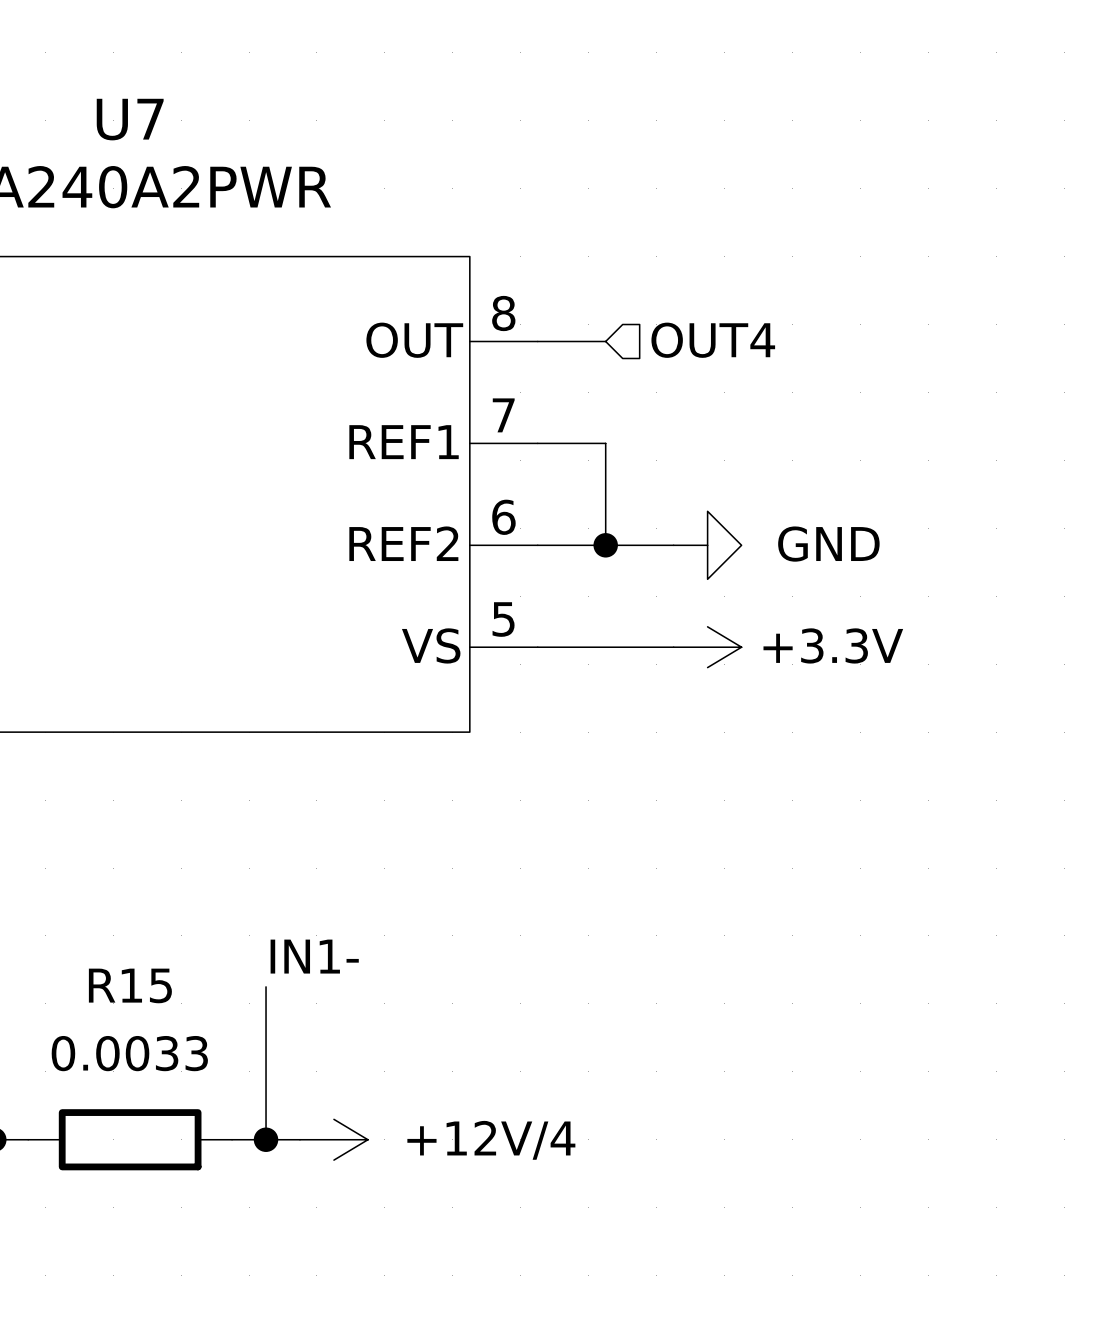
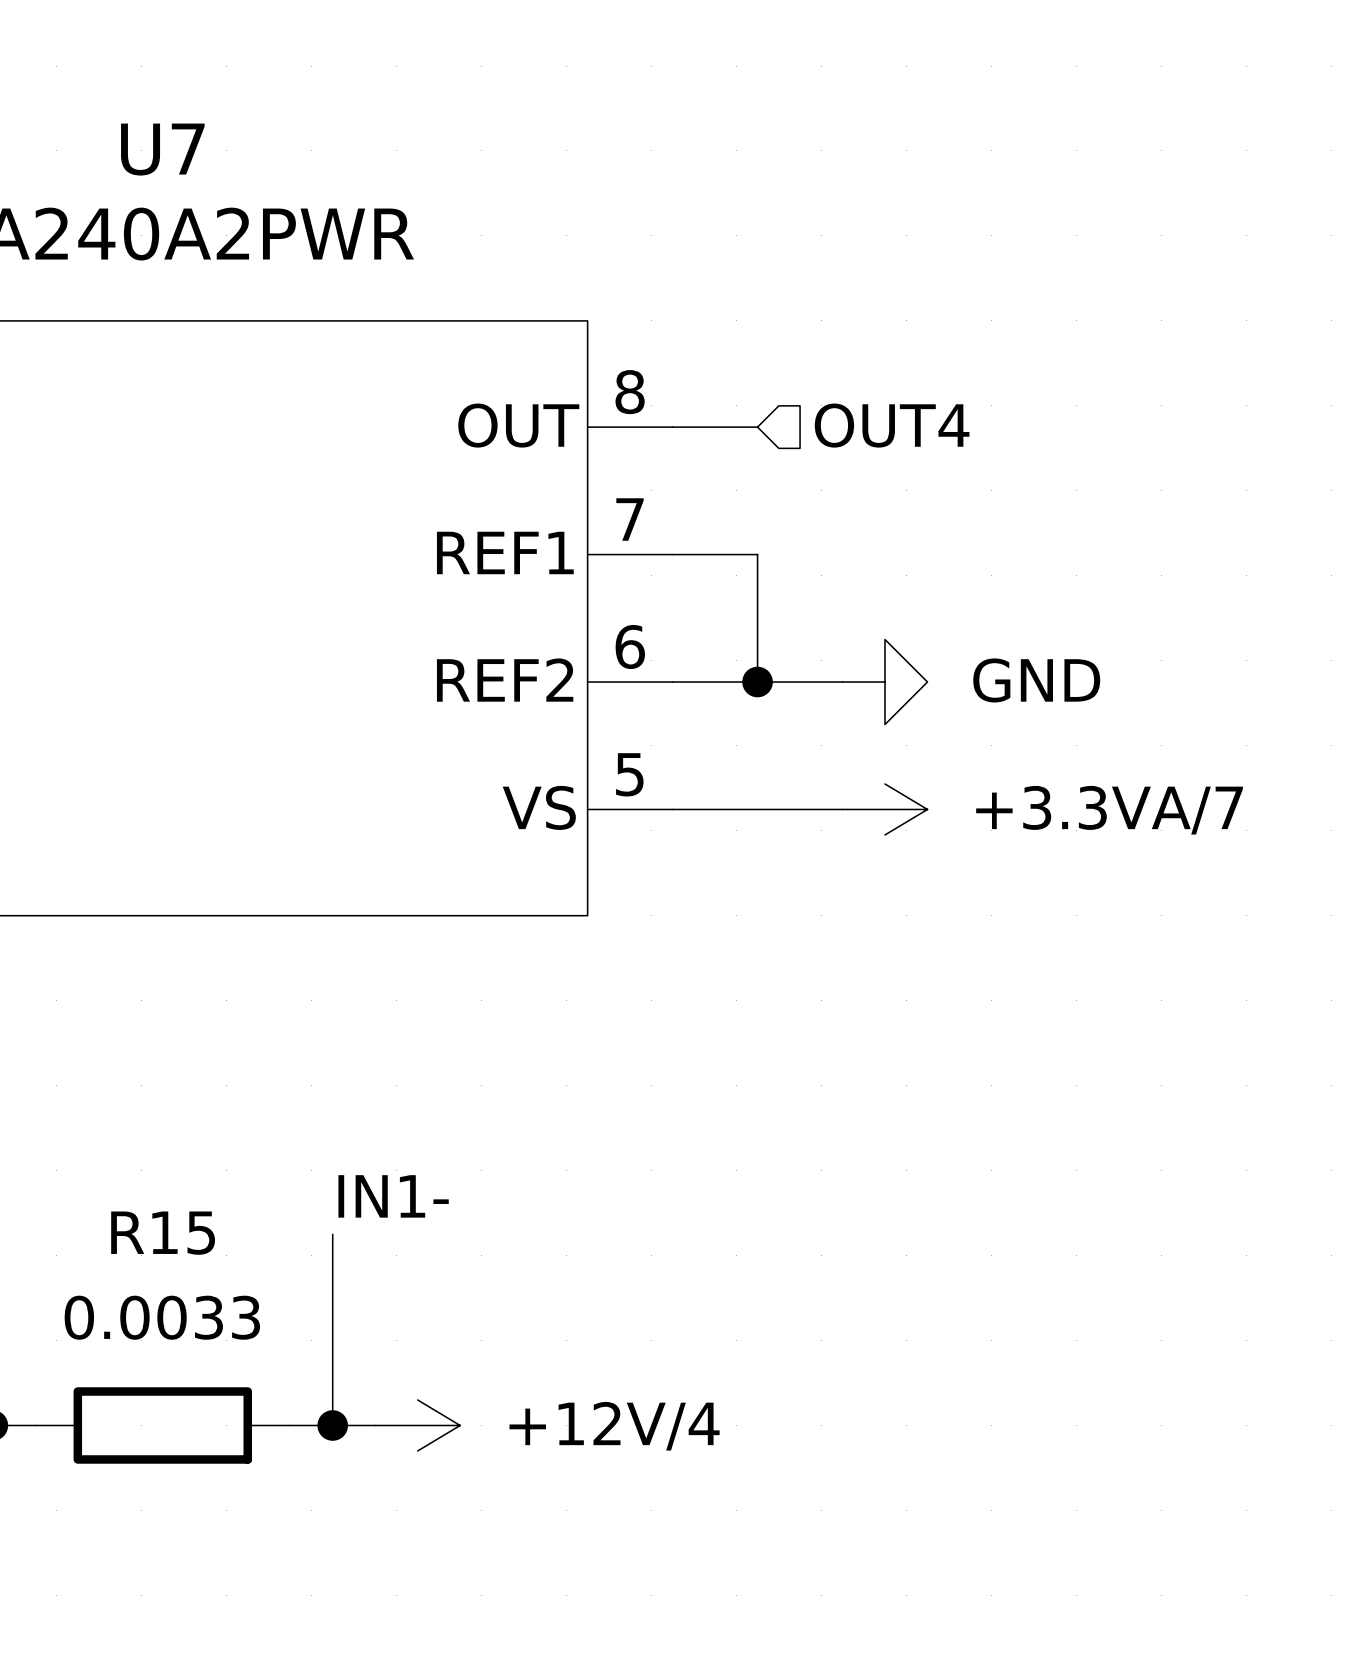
power symbol: +3.3V (707, 647) -> +3.3VA/7 (885, 809)

